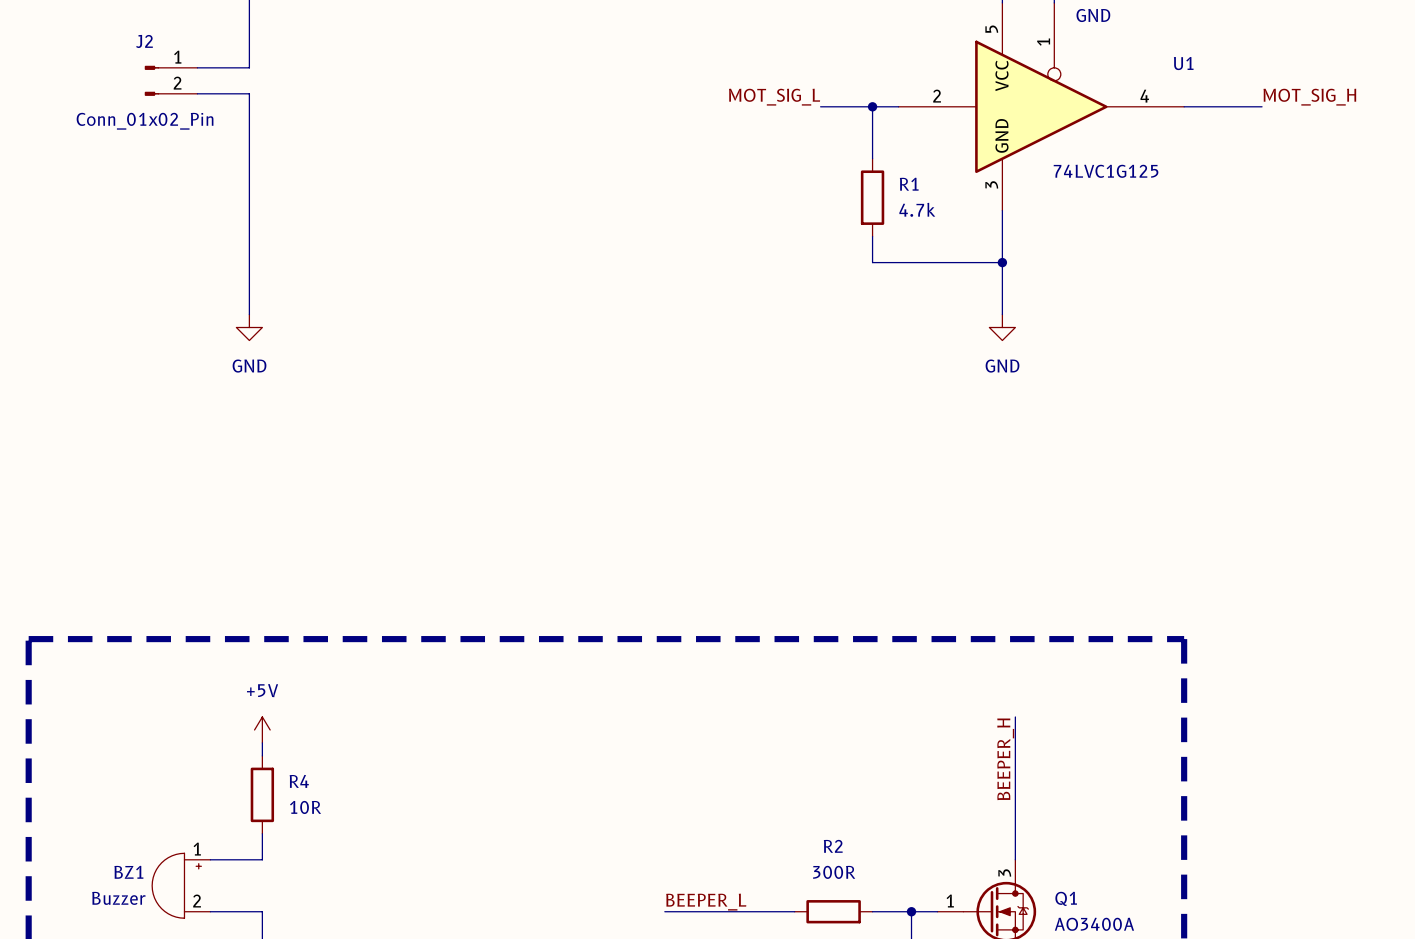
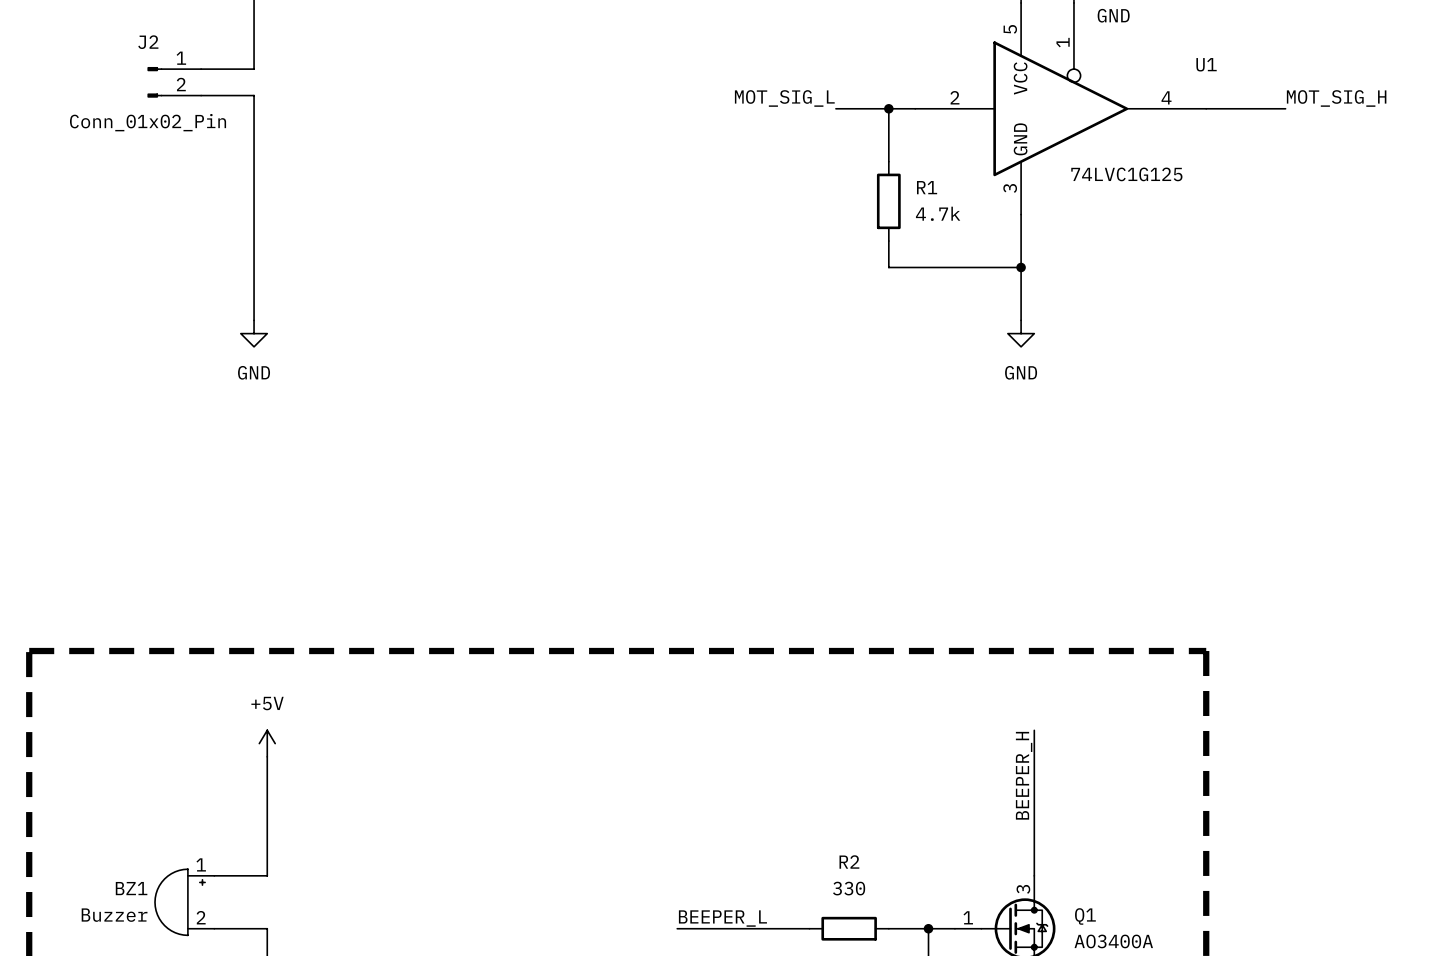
wire: none -> (267, 770) (267, 849)
R4: 10R (262, 794) -> none
R2 value: 300R (834, 872) -> 330 (849, 888)

